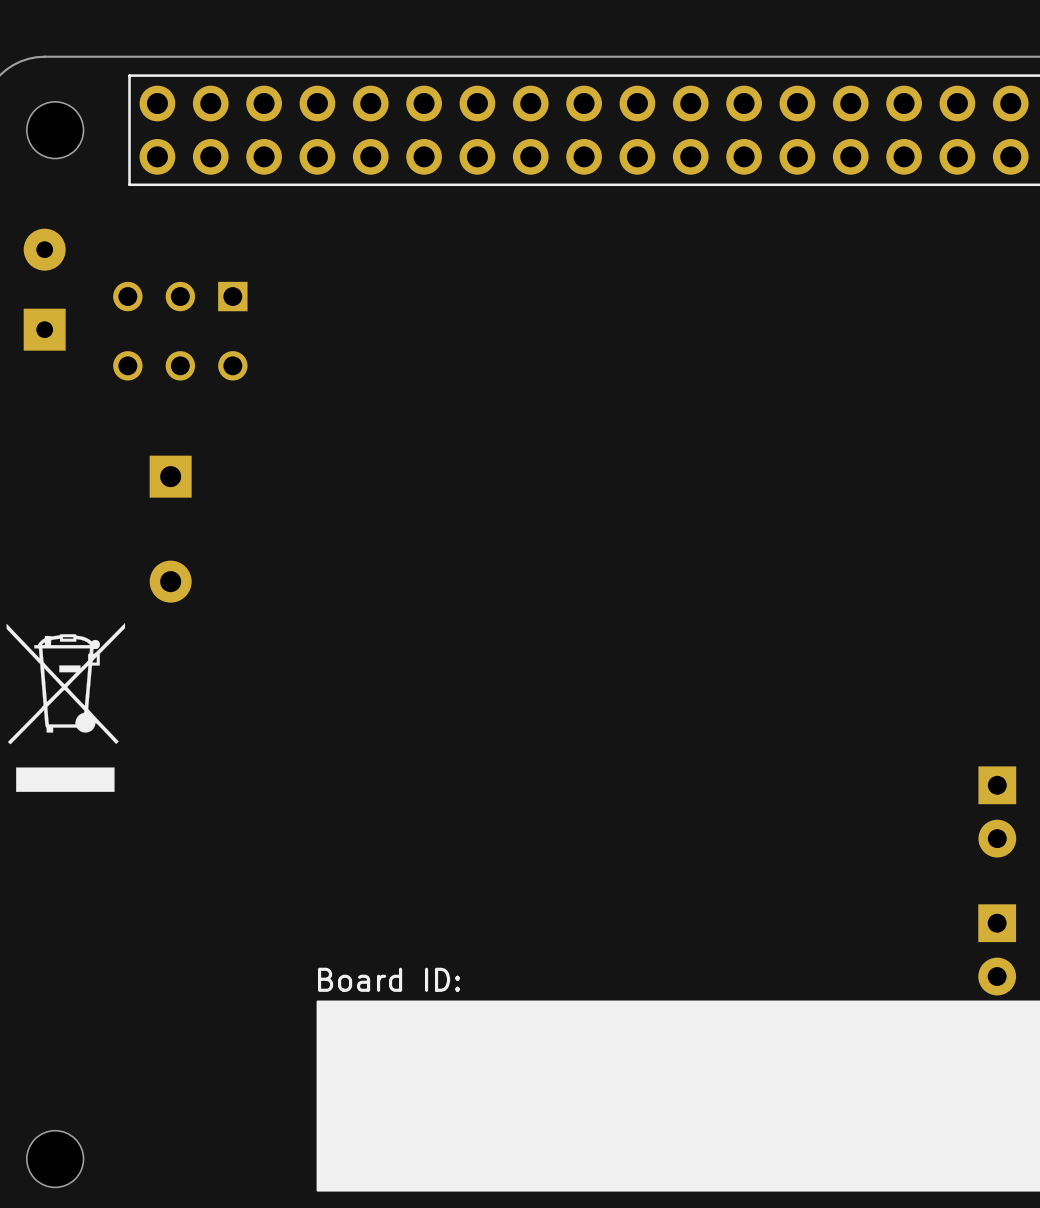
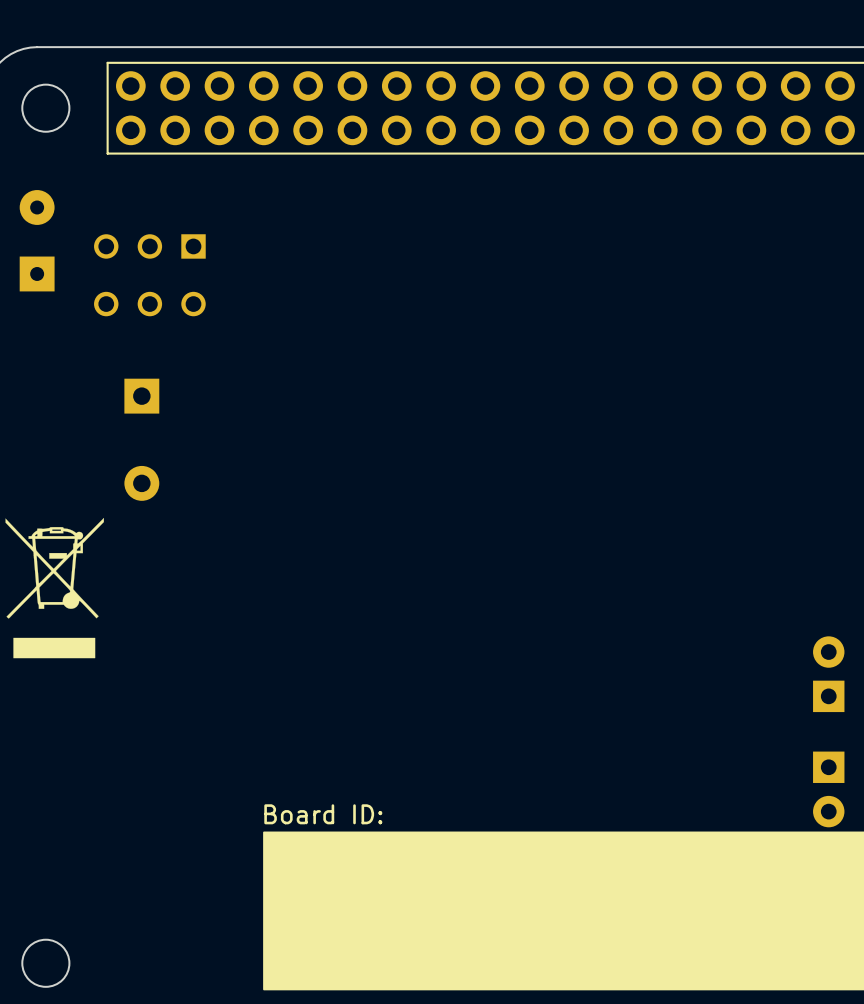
part rotation: 0° (997, 811) -> 180° (828, 674)

